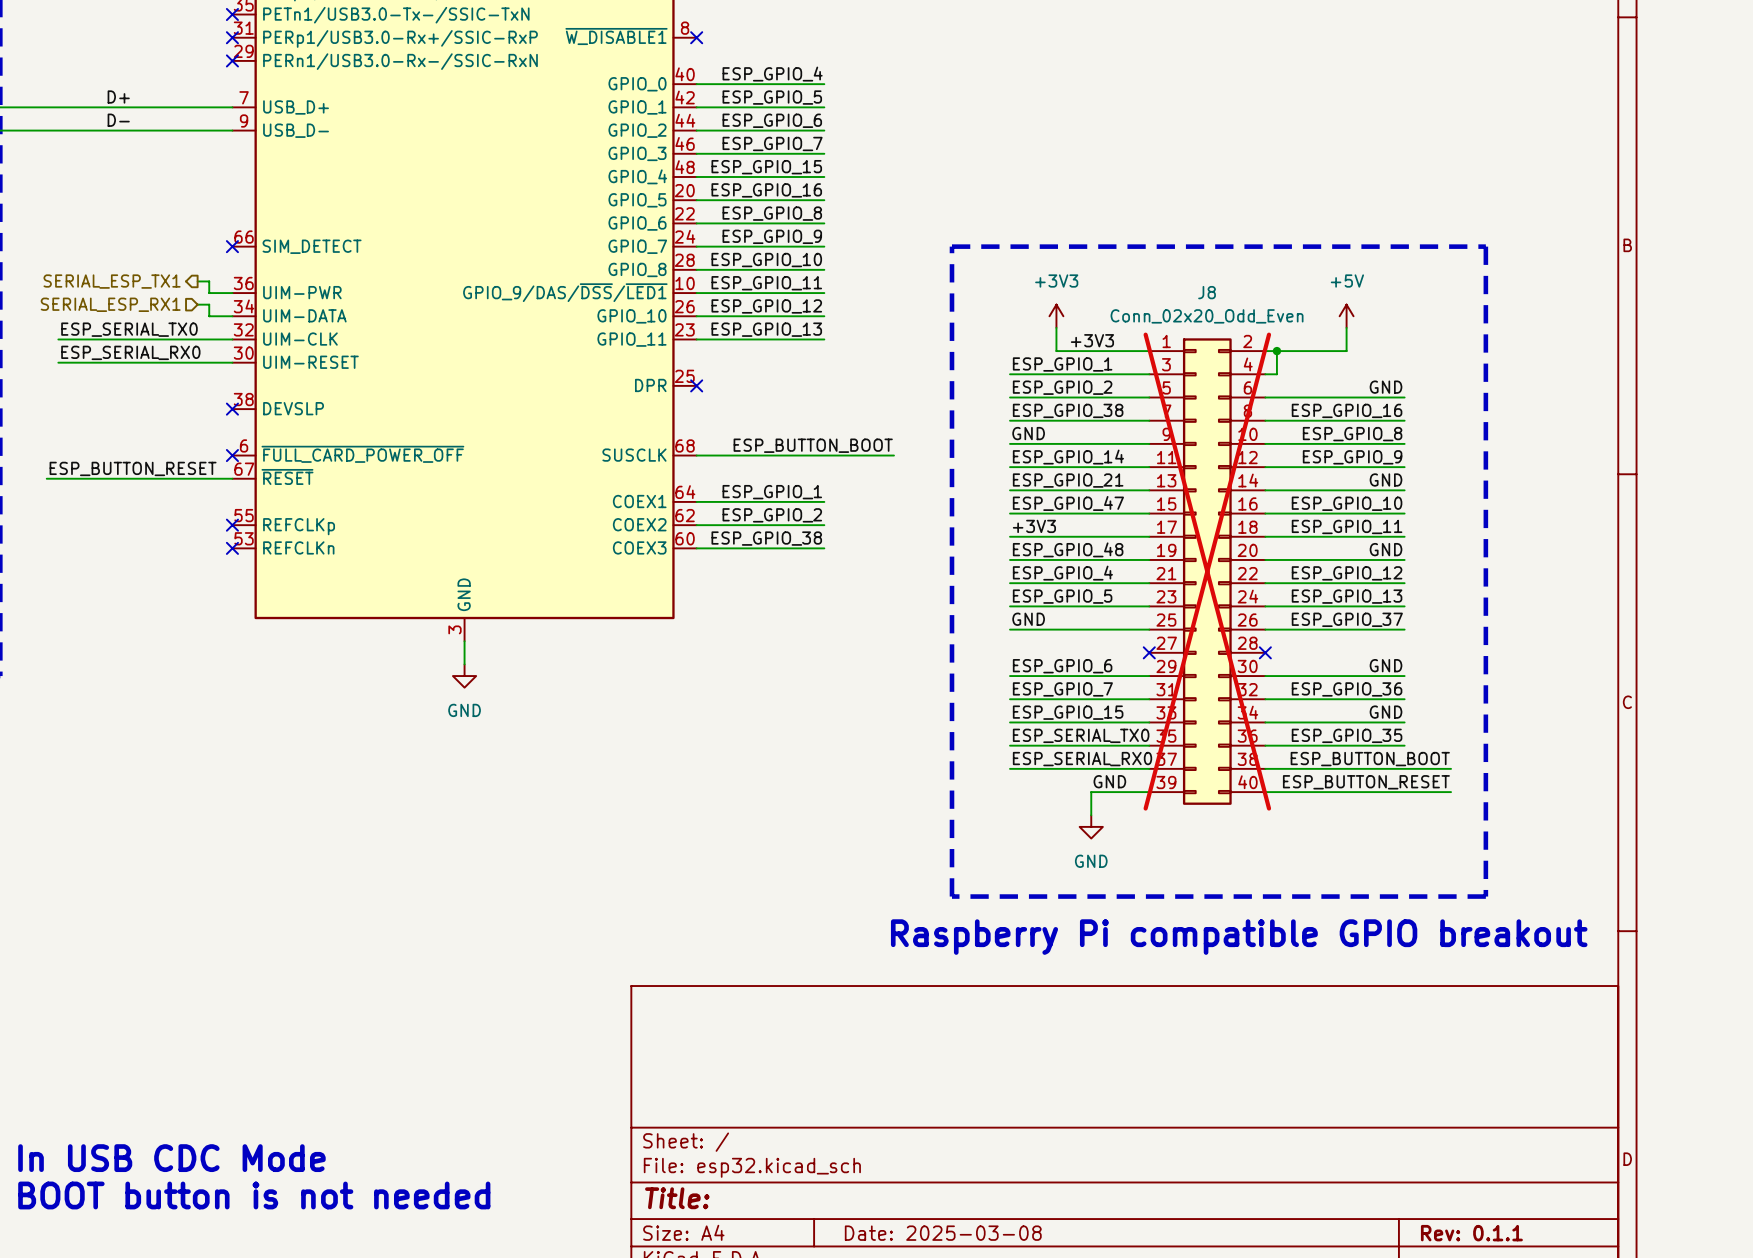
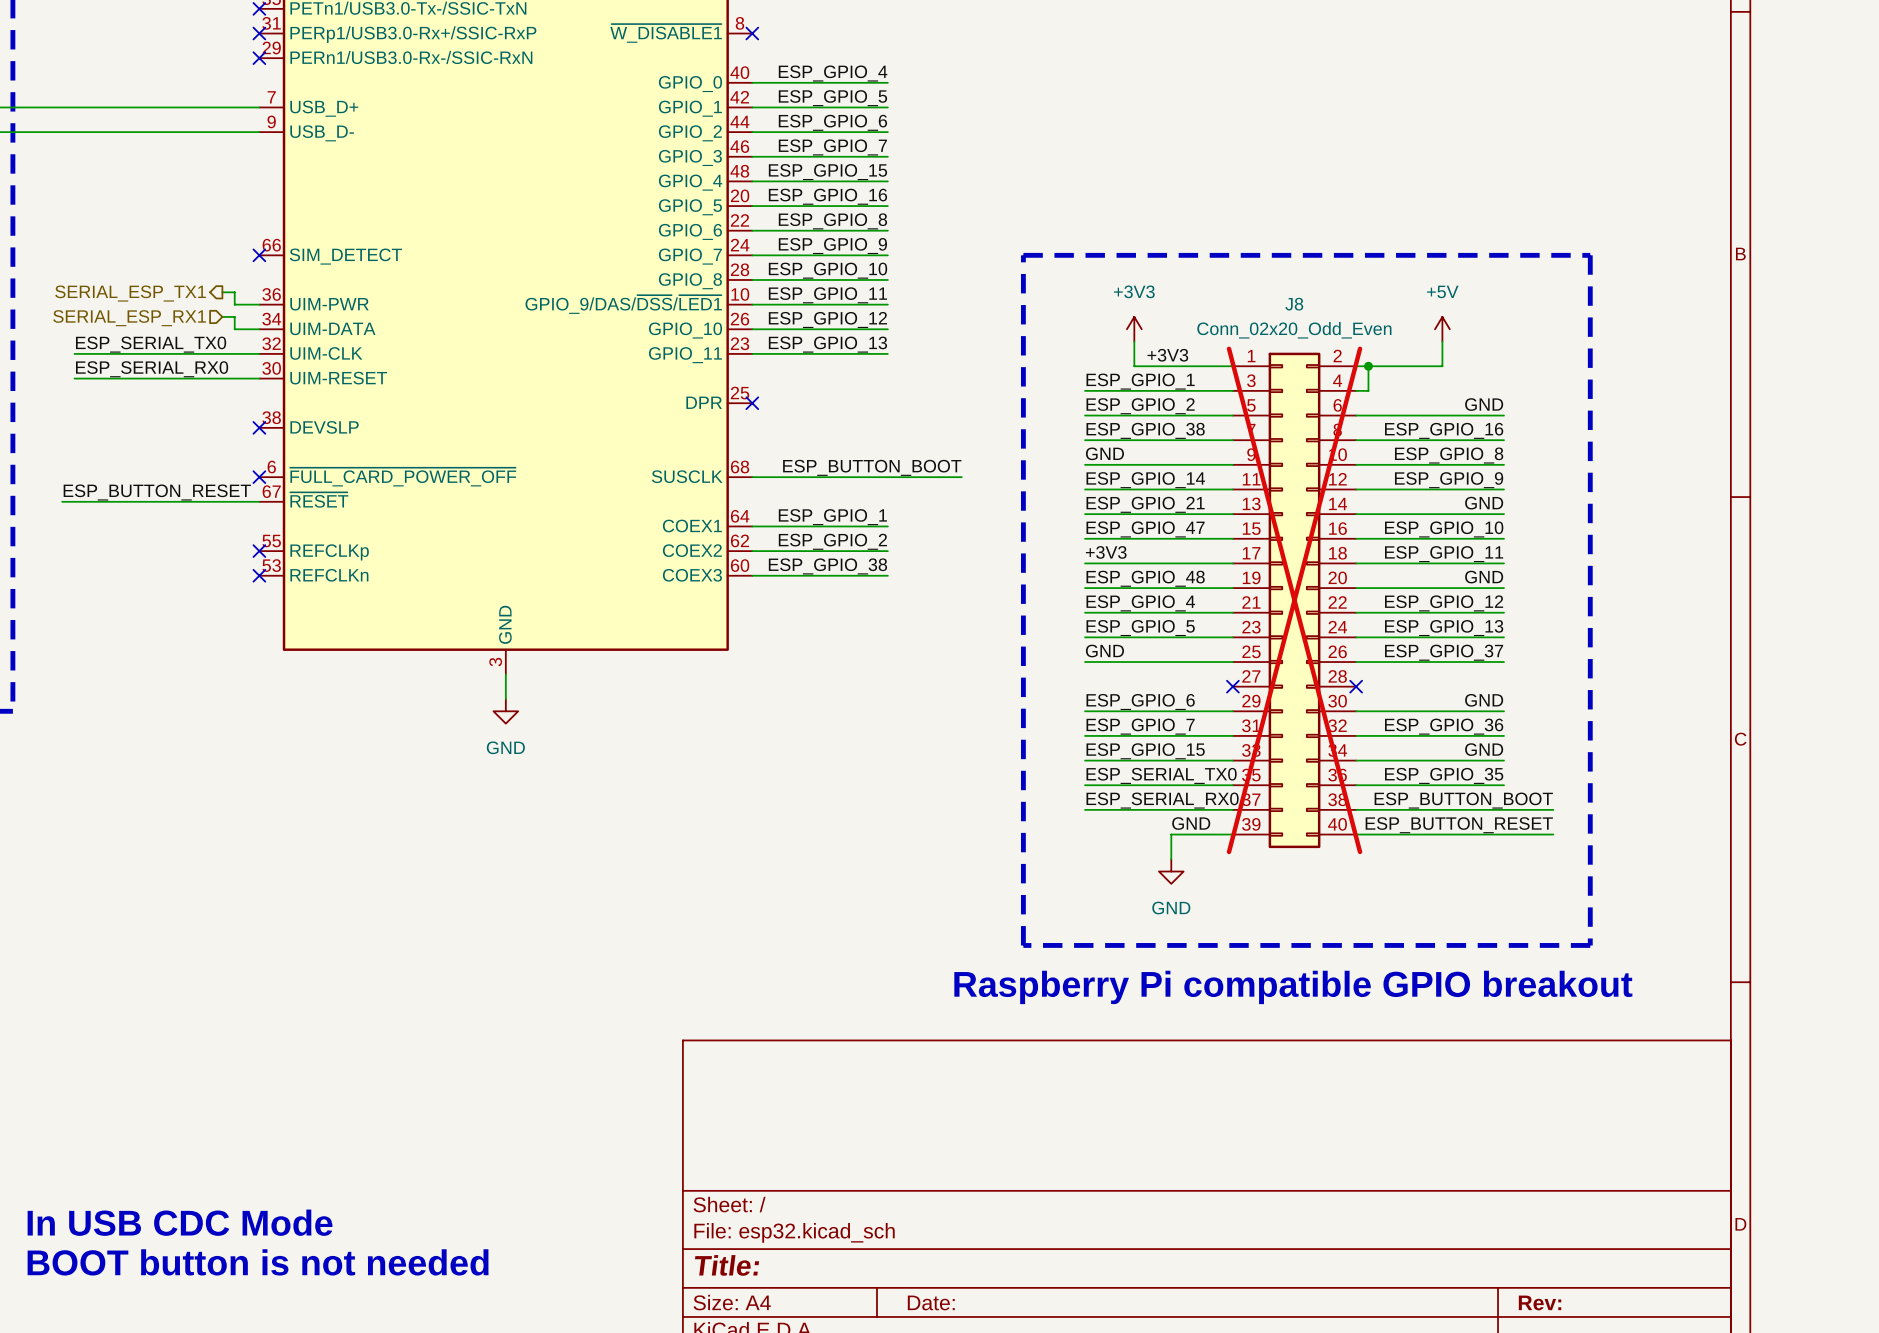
label: D+ (118, 97) -> none
label: D- (118, 120) -> none
title block: Date: 2025-03-08 (943, 1233) -> Date: (931, 1302)
title block: Rev: 0.1.1 (1471, 1233) -> Rev: (1540, 1302)

